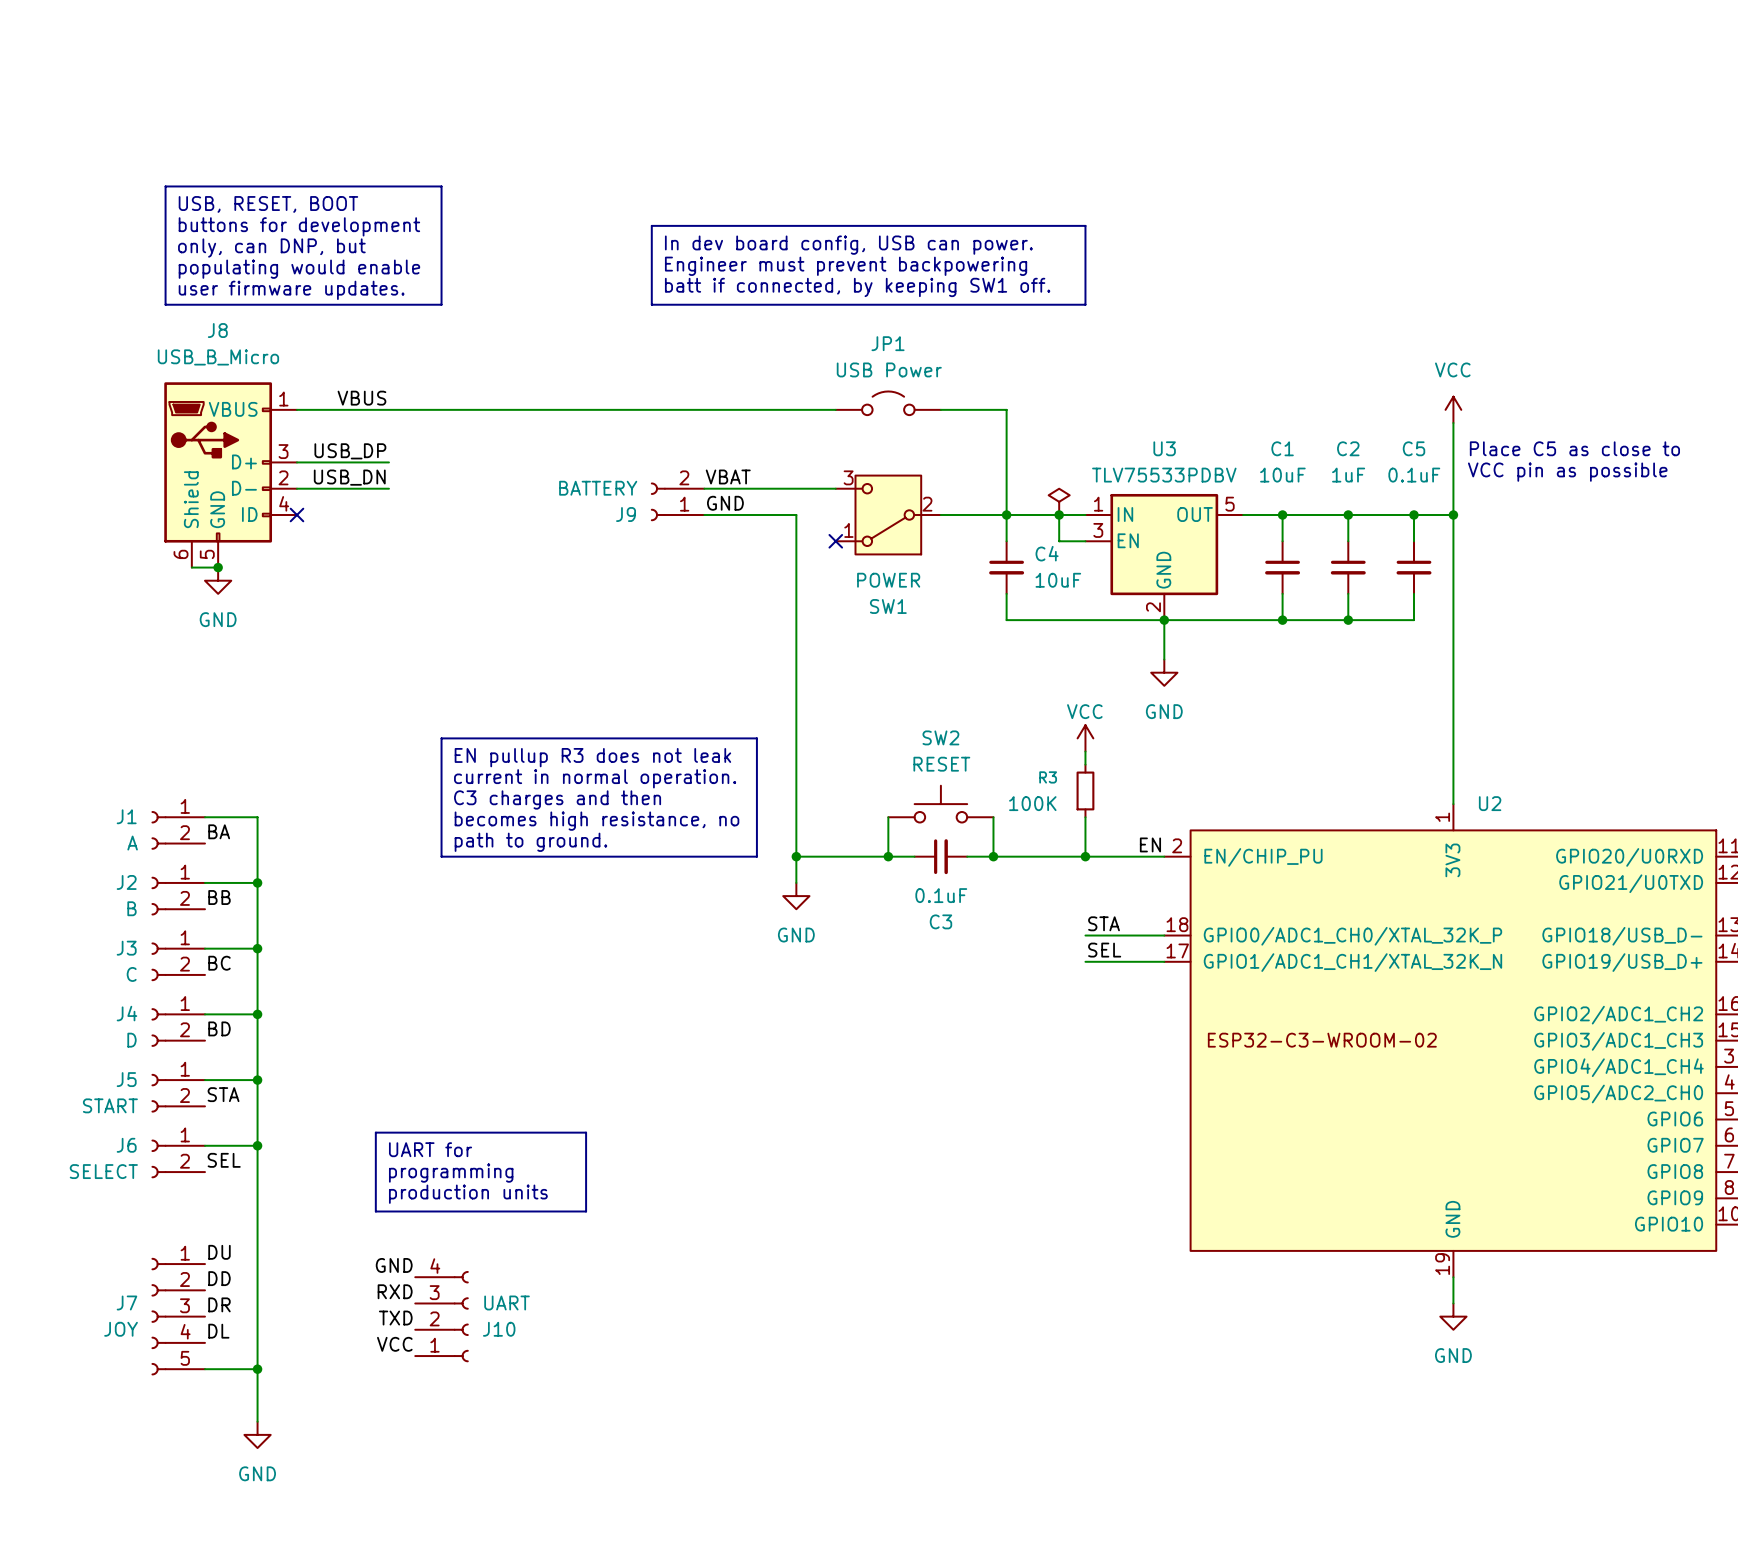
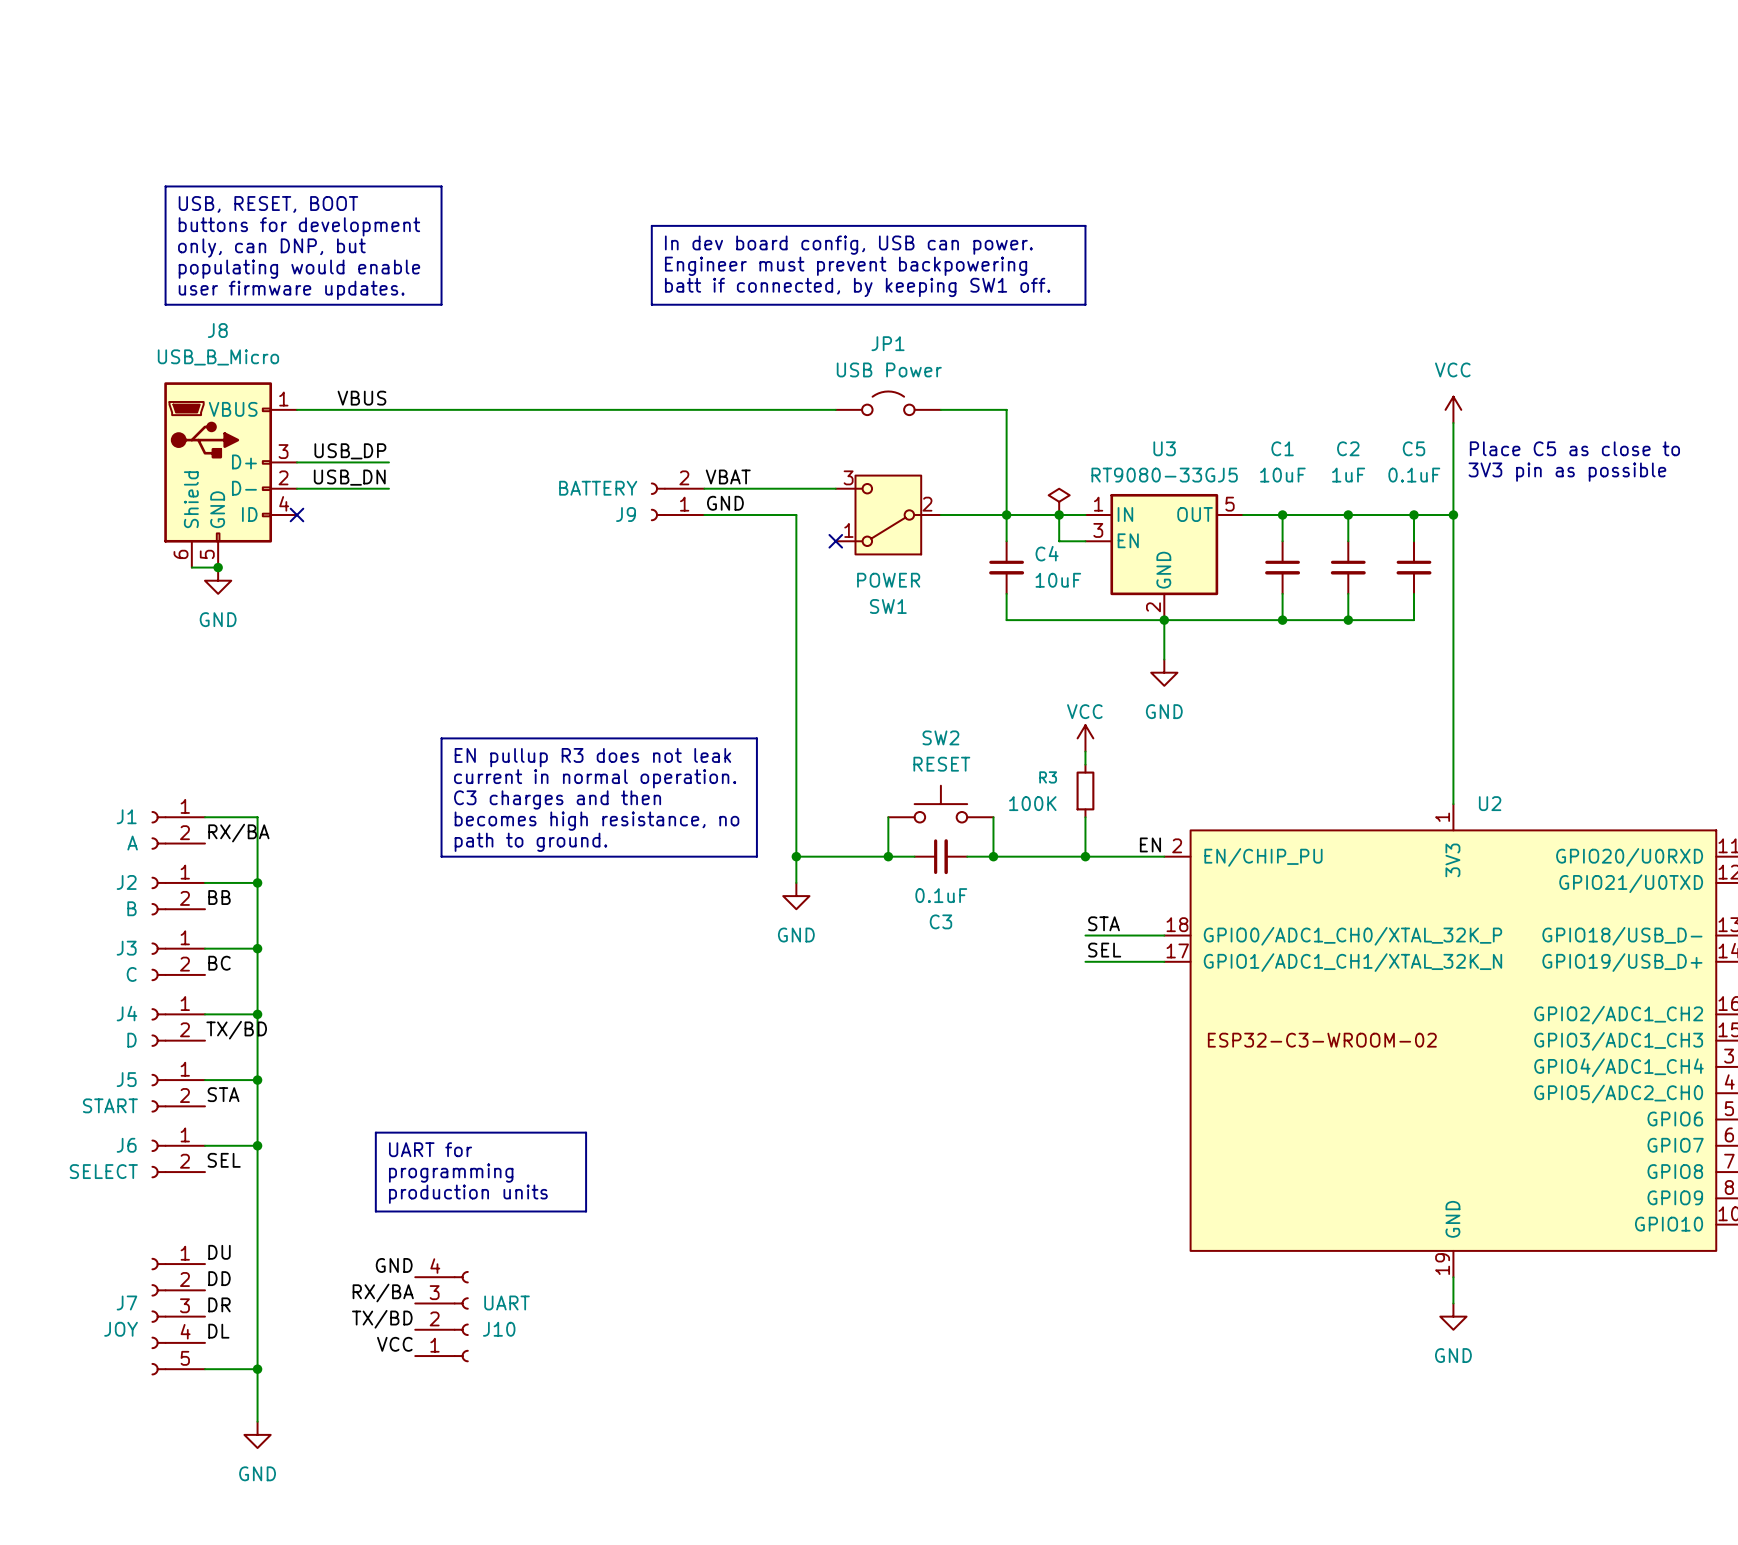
text: VCC pin as possible (1567, 472) -> 3V3 pin as possible (1567, 472)
U3 value: TLV75533PDBV (1164, 475) -> RT9080-33GJ5 (1164, 475)
label: BA (219, 831) -> RX/BA (238, 833)
label: BD (219, 1028) -> TX/BD (236, 1030)
label: RXD (395, 1291) -> RX/BA (383, 1293)
label: TXD (395, 1318) -> TX/BD (382, 1319)

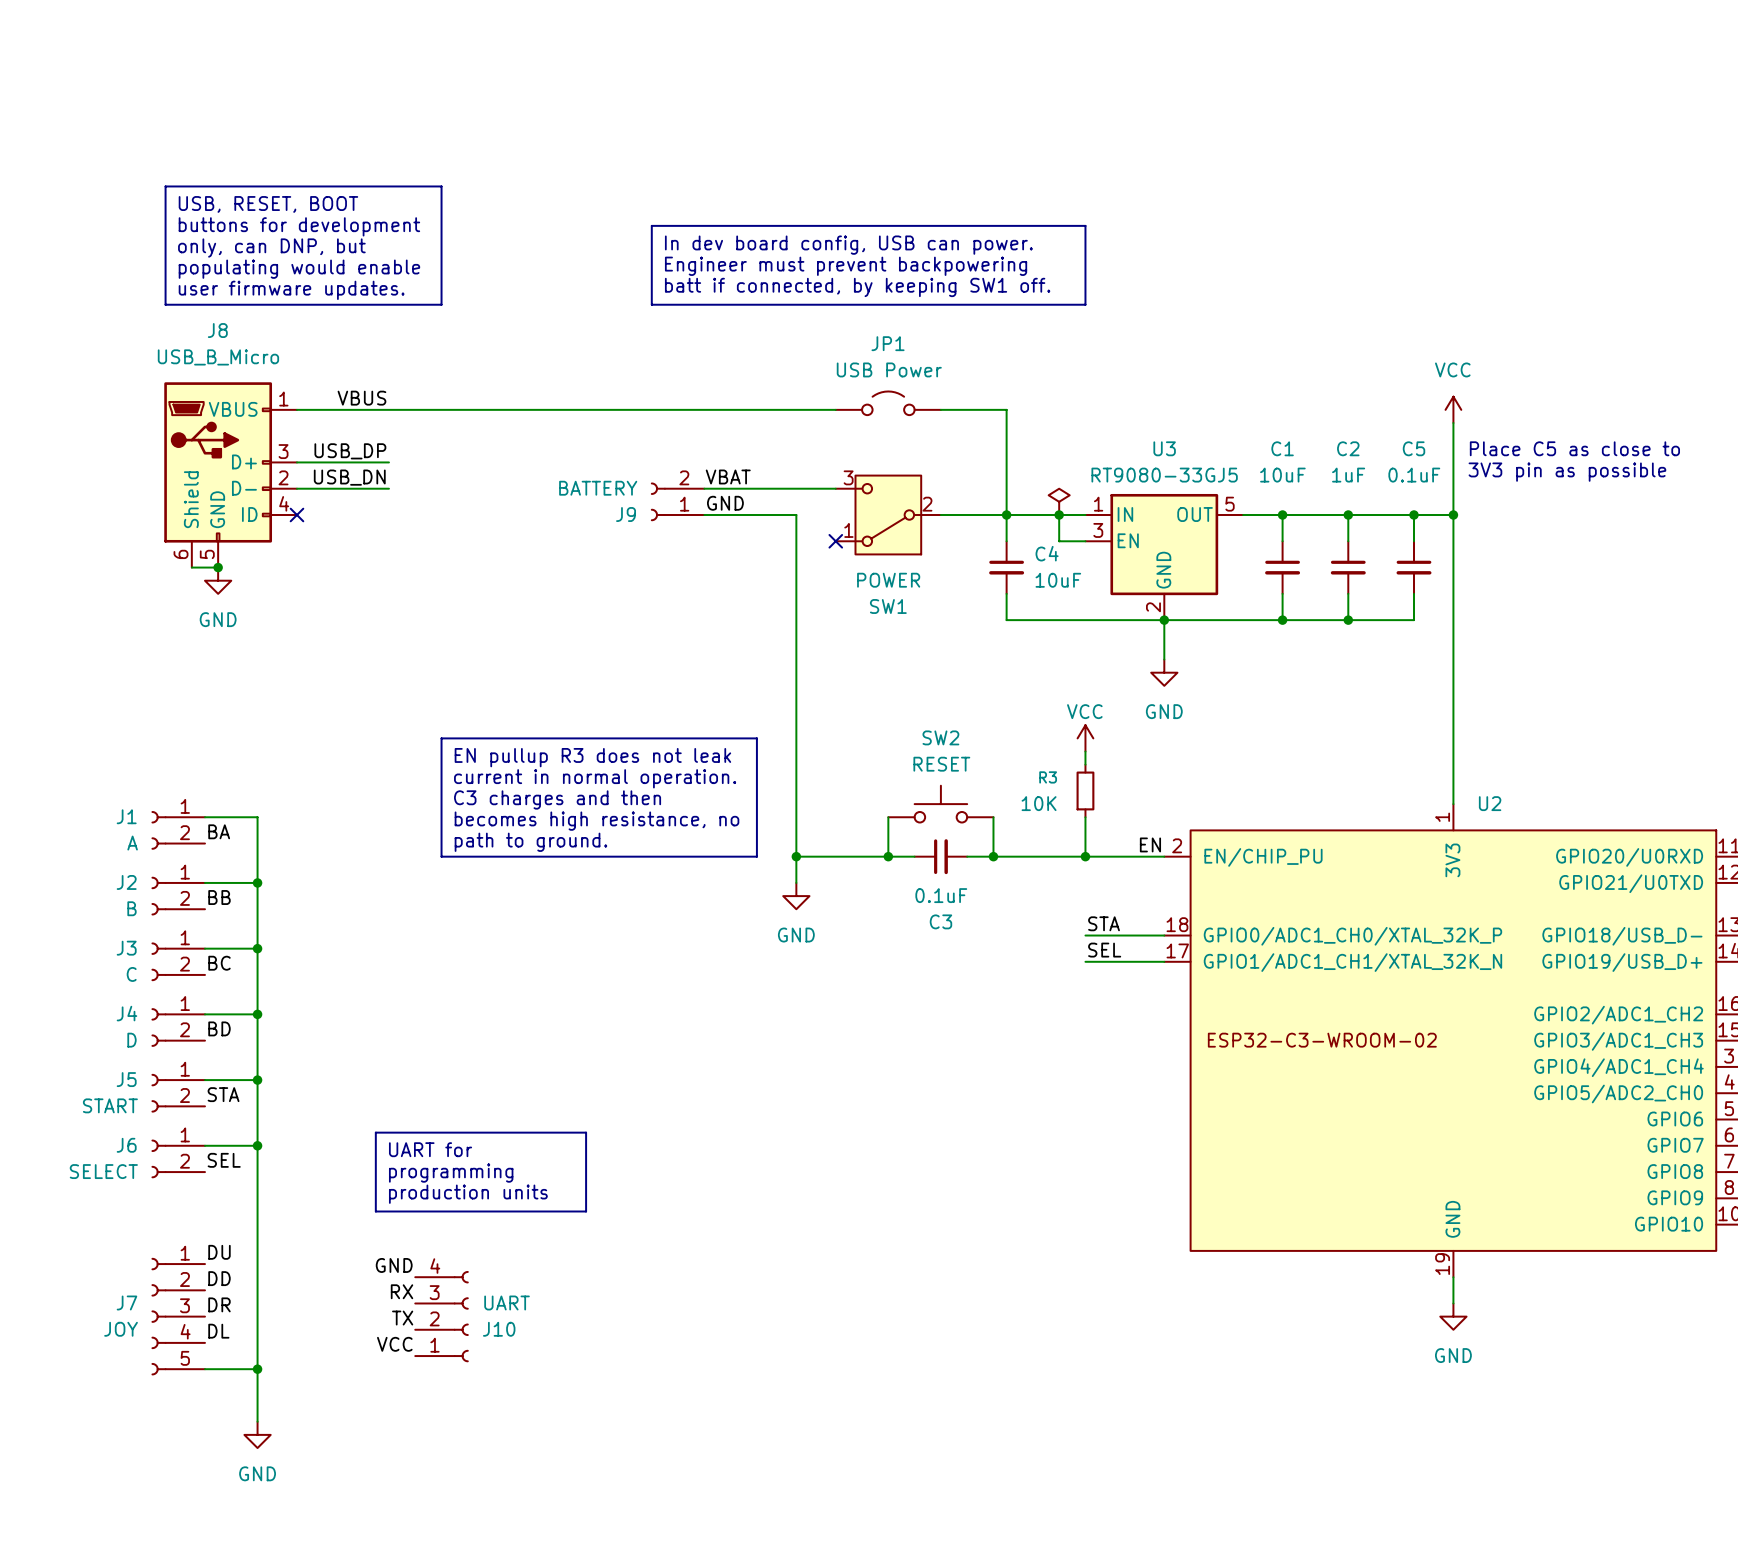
R3 value: 100K (1032, 803) -> 10K (1039, 803)
label: RX/BA (238, 833) -> BA (219, 831)
label: TX/BD (236, 1030) -> BD (219, 1028)
label: RX/BA (383, 1293) -> RX (402, 1291)
label: TX/BD (382, 1319) -> TX (402, 1318)

